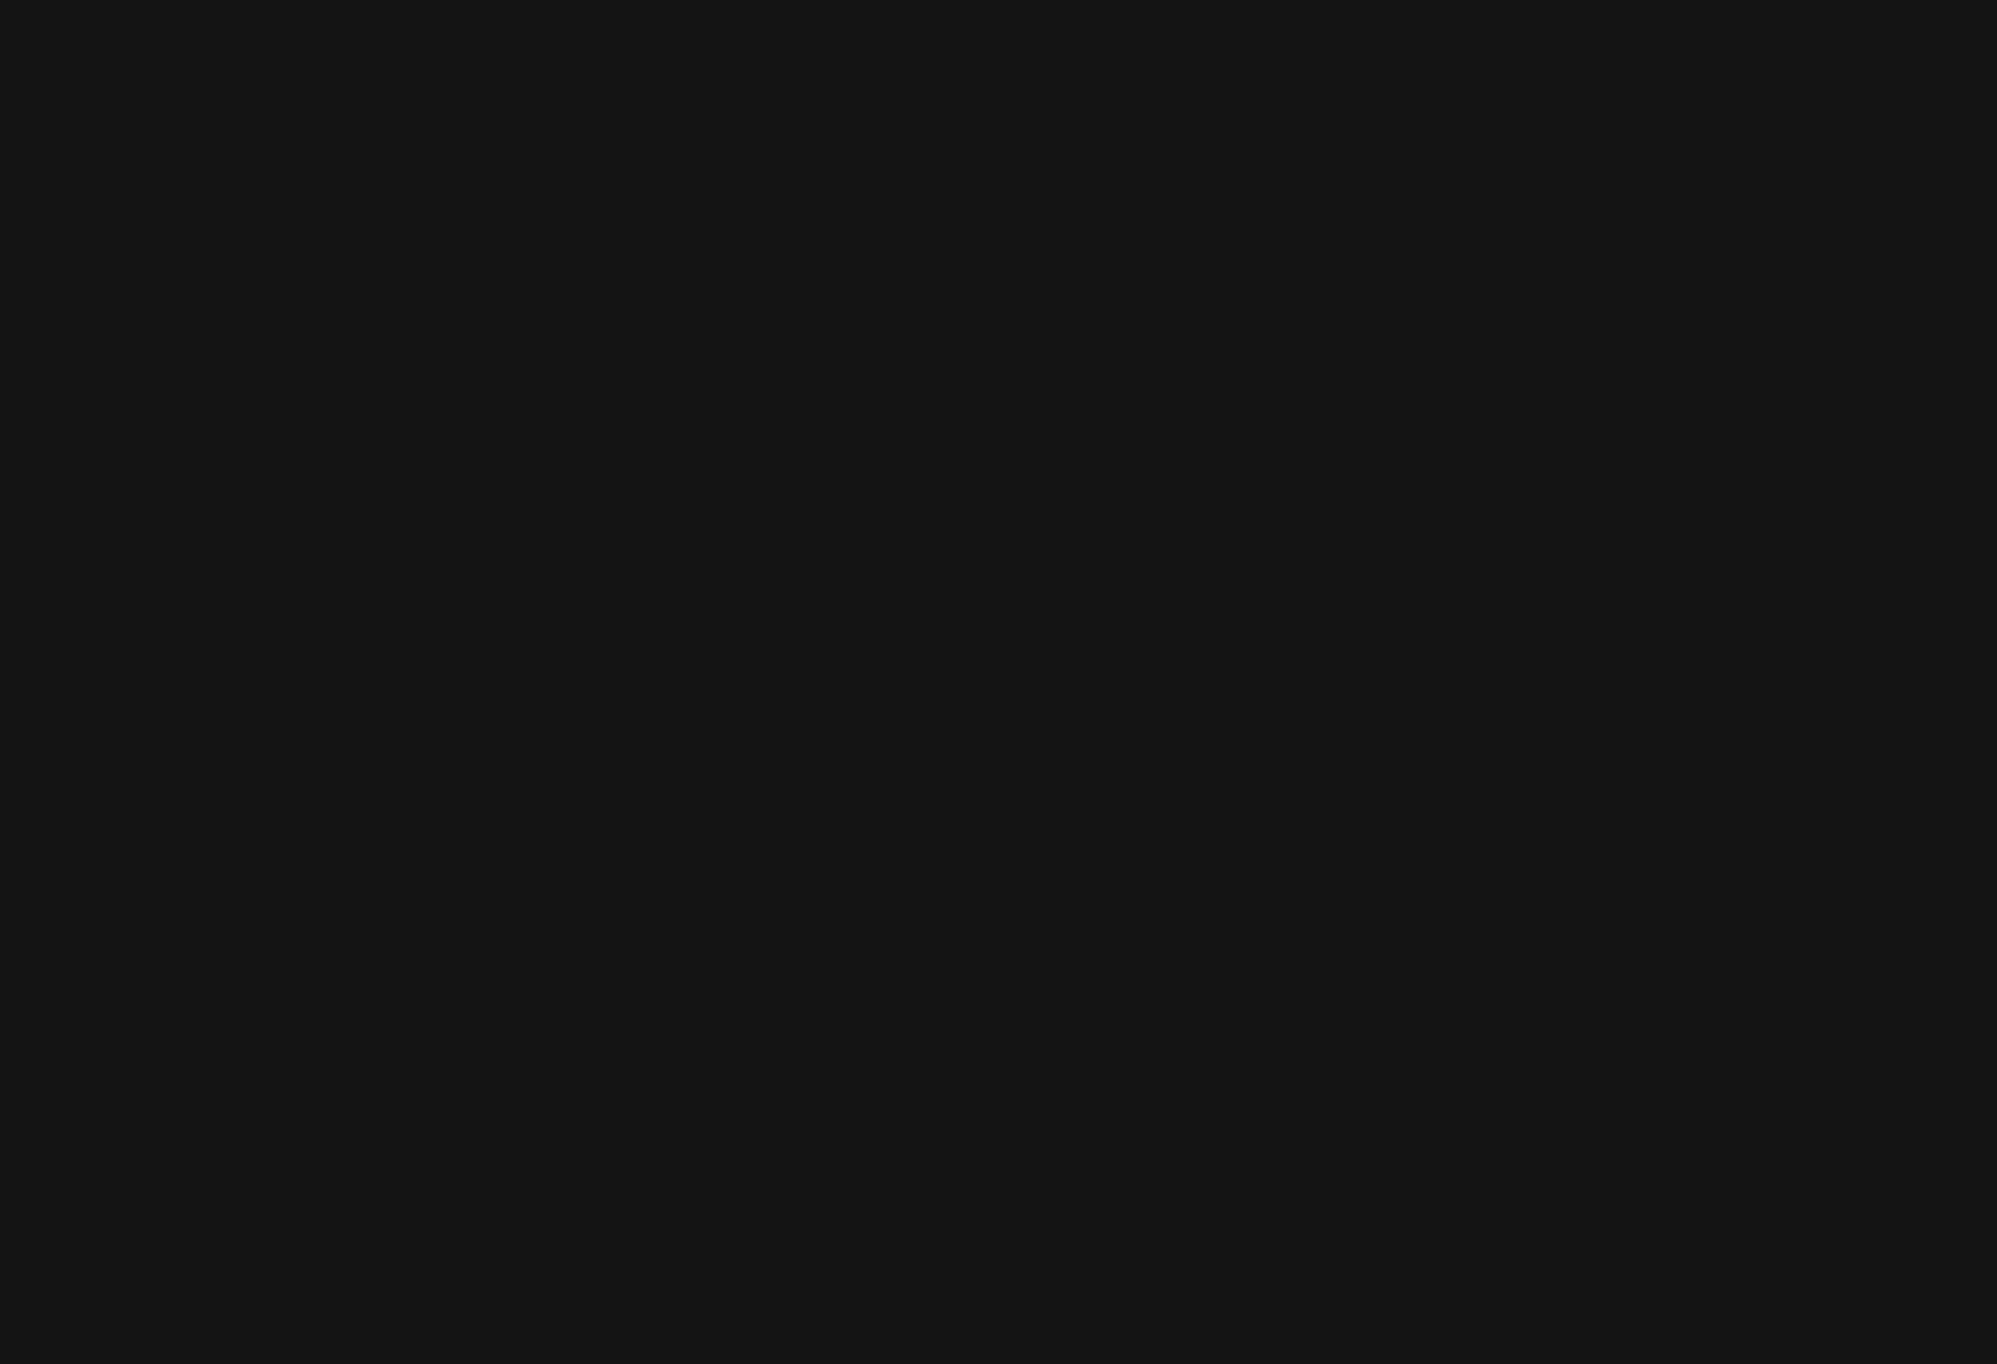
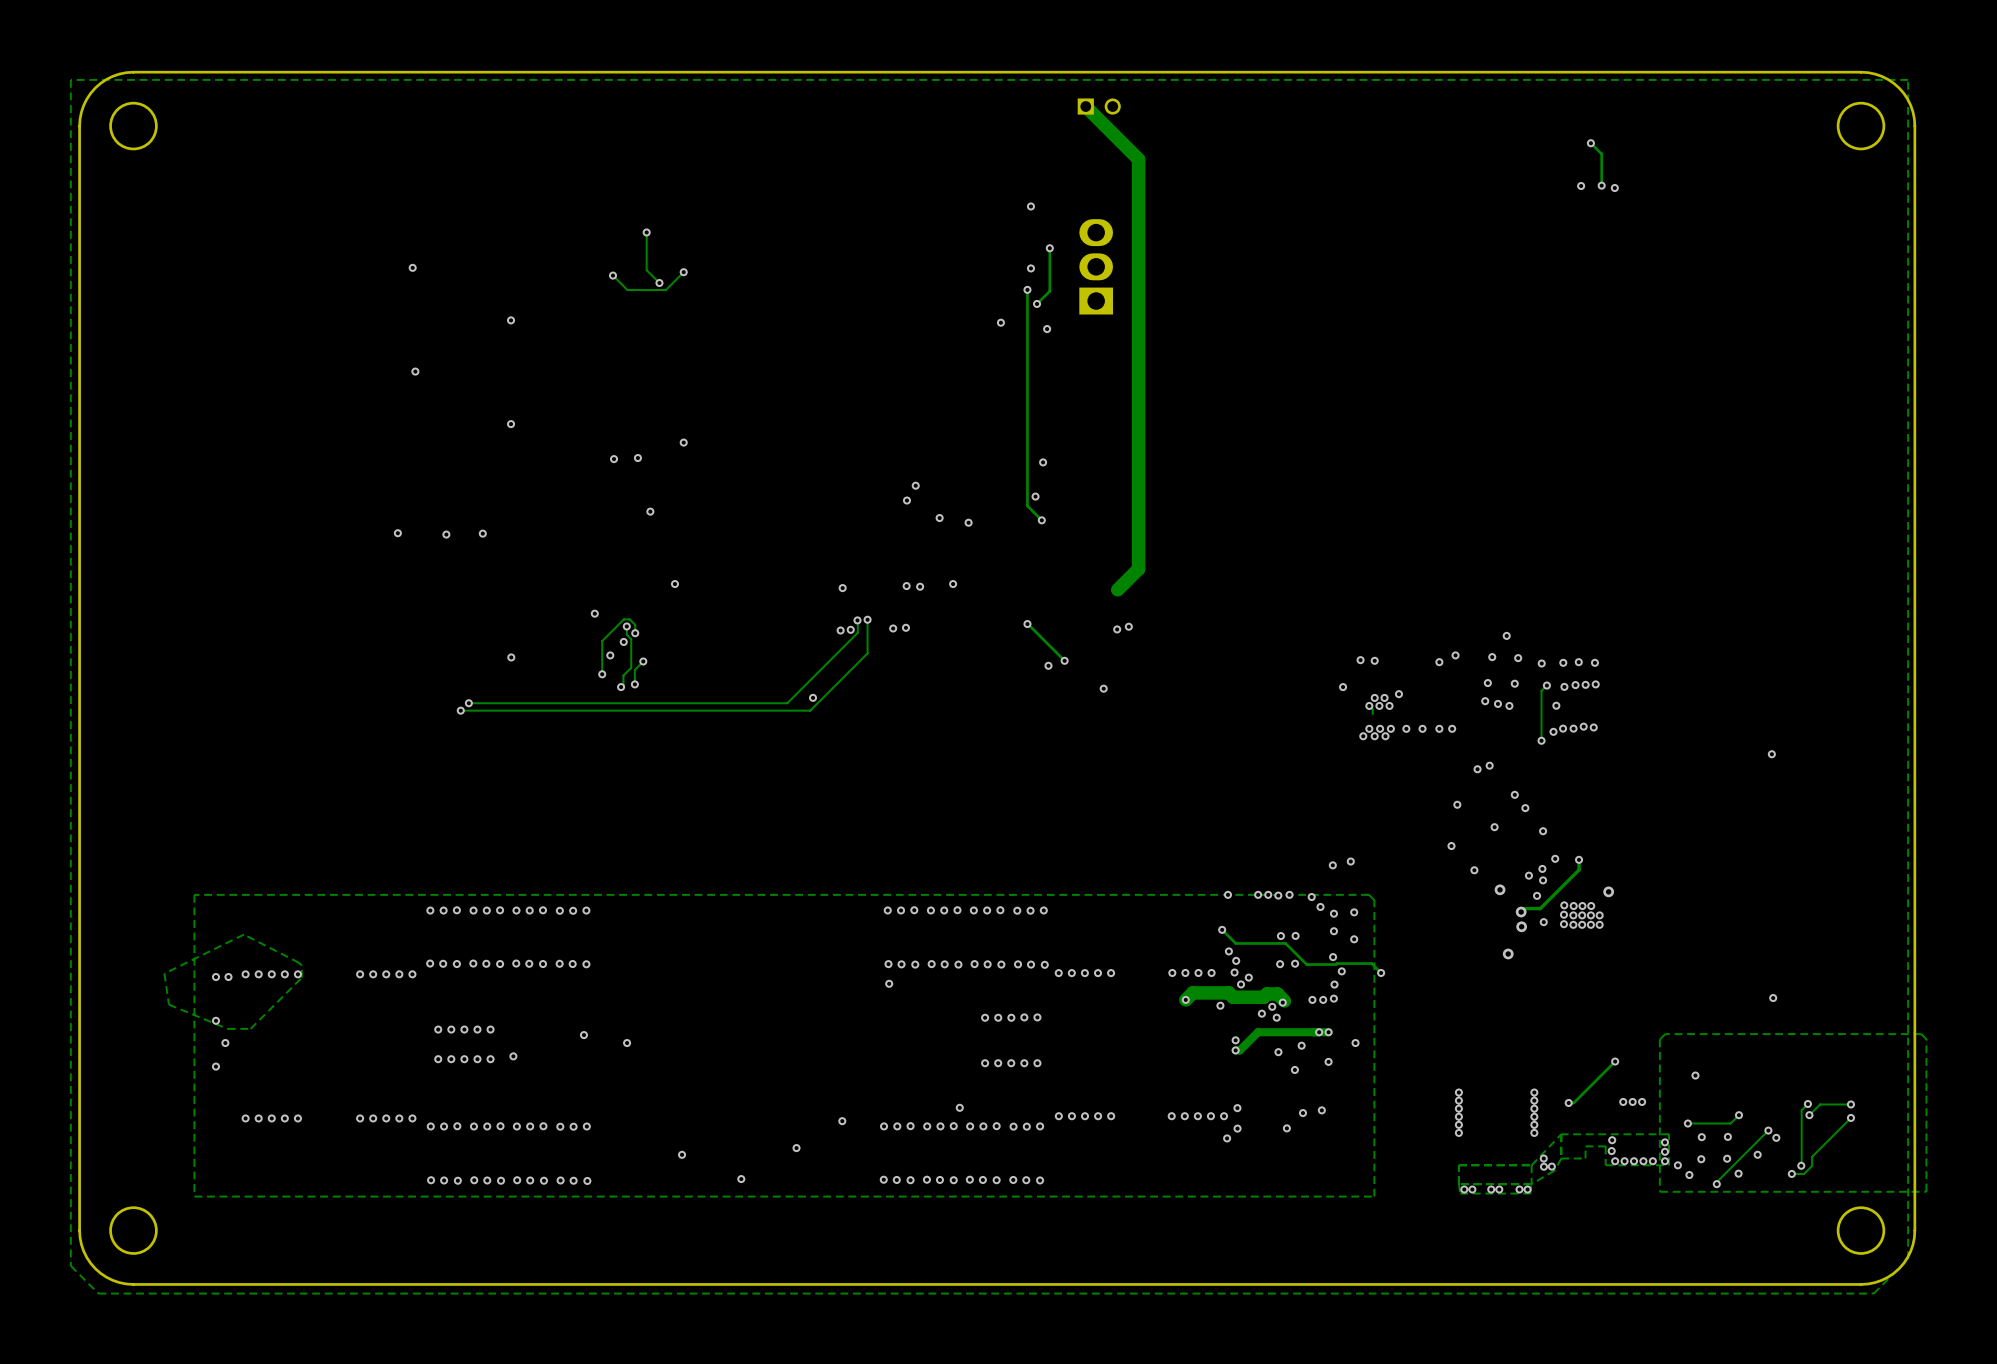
board edge: none -> (1860, 72) (133, 72) (112, 76) (100, 83) (86, 99) (81, 112) (79, 126) (79, 1230) (81, 1244) (90, 1263) (106, 1277) (119, 1282) (133, 1284) (1860, 1284) (1874, 1282) (1893, 1273) (1903, 1263) (1910, 1251) (1914, 1230) (1914, 126) (1910, 105) (1899, 87) (1881, 76) (1860, 72)
zone outline: none -> (1908, 79) (70, 79) (70, 1265) (98, 1293) (1873, 1293) (1908, 1259) (1908, 79)
round board edge: none -> [109, 101, 158, 151]
round board edge: none -> [1836, 101, 1886, 151]
track: none -> (1085, 106) (1138, 159) (1138, 568) (1117, 589)
part: none -> (1099, 106)
track: none -> (1590, 143) (1601, 154) (1601, 185)
via: none -> (1590, 143)
via: none -> (1601, 185)
via: none -> (1581, 186)
via: none -> (1614, 188)
via: none -> (1030, 206)
track: none -> (646, 232) (646, 270) (659, 282)
via: none -> (646, 232)
track: none -> (1049, 248) (1049, 291) (1037, 303)
via: none -> (1049, 248)
part: none -> (1096, 266)
via: none -> (412, 267)
via: none -> (1030, 268)
track: none -> (683, 272) (665, 290) (627, 290) (613, 275)
via: none -> (683, 272)
via: none -> (613, 275)
via: none -> (659, 282)
track: none -> (1027, 289) (1027, 505) (1041, 520)
via: none -> (1027, 289)
via: none -> (1037, 303)
via: none -> (511, 320)
via: none -> (1000, 322)
via: none -> (1047, 329)
via: none -> (415, 371)
via: none -> (511, 424)
via: none -> (683, 442)
via: none -> (637, 458)
via: none -> (614, 459)
via: none -> (1043, 462)
via: none -> (915, 485)
via: none -> (1035, 496)
via: none -> (906, 500)
via: none -> (650, 511)
via: none -> (939, 518)
via: none -> (1041, 520)
via: none -> (968, 522)
via: none -> (397, 533)
via: none -> (482, 533)
via: none -> (446, 534)
via: none -> (674, 584)
via: none -> (953, 584)
via: none -> (906, 586)
via: none -> (920, 586)
via: none -> (842, 588)
via: none -> (594, 613)
track: none -> (867, 619) (867, 653) (810, 710) (460, 710)
via: none -> (867, 619)
track: none -> (857, 620) (857, 632) (787, 703) (468, 703)
via: none -> (857, 620)
track: none -> (1027, 624) (1064, 660)
via: none -> (1027, 624)
track: none -> (626, 626) (626, 634) (631, 639) (631, 667) (623, 675) (623, 684) (621, 687)
via: none -> (626, 626)
via: none -> (1128, 626)
via: none -> (905, 627)
via: none -> (893, 628)
via: none -> (850, 629)
via: none -> (1117, 629)
via: none -> (840, 630)
track: none -> (635, 633) (635, 624) (629, 619) (623, 619) (602, 641) (602, 674)
via: none -> (635, 633)
via: none -> (1506, 635)
via: none -> (623, 641)
via: none -> (610, 655)
via: none -> (1455, 655)
via: none -> (511, 657)
via: none -> (1492, 657)
via: none -> (1518, 658)
via: none -> (1064, 660)
via: none -> (1360, 660)
via: none -> (1374, 660)
track: none -> (643, 661) (634, 669) (634, 684)
via: none -> (643, 661)
via: none -> (1439, 662)
via: none -> (1563, 662)
via: none -> (1578, 662)
via: none -> (1594, 662)
via: none -> (1541, 663)
via: none -> (1048, 665)
via: none -> (602, 674)
via: none -> (1487, 683)
via: none -> (1514, 683)
via: none -> (634, 684)
via: none -> (1585, 684)
via: none -> (1595, 684)
track: none -> (1546, 685) (1541, 690) (1541, 740)
via: none -> (1546, 685)
via: none -> (1575, 685)
via: none -> (1564, 686)
via: none -> (621, 687)
via: none -> (1343, 687)
via: none -> (1103, 688)
via: none -> (1398, 694)
via: none -> (813, 697)
via: none -> (1374, 697)
via: none -> (1384, 697)
via: none -> (1485, 701)
via: none -> (468, 703)
via: none -> (1497, 703)
track: none -> (1369, 705) (1372, 709) (1372, 714)
via: none -> (1369, 705)
via: none -> (1379, 705)
via: none -> (1389, 705)
via: none -> (1509, 705)
via: none -> (1556, 705)
via: none -> (460, 710)
via: none -> (1583, 726)
via: none -> (1593, 727)
via: none -> (1369, 728)
via: none -> (1380, 728)
via: none -> (1390, 728)
via: none -> (1406, 728)
via: none -> (1422, 728)
via: none -> (1439, 728)
via: none -> (1452, 728)
via: none -> (1563, 728)
via: none -> (1573, 728)
via: none -> (1553, 731)
via: none -> (1363, 736)
via: none -> (1374, 736)
via: none -> (1385, 736)
via: none -> (1541, 740)
via: none -> (1771, 754)
via: none -> (1489, 765)
via: none -> (1477, 769)
via: none -> (1514, 794)
via: none -> (1457, 804)
via: none -> (1525, 808)
via: none -> (1494, 827)
via: none -> (1543, 831)
via: none -> (1451, 846)
via: none -> (1555, 858)
track: none -> (1579, 859) (1579, 869) (1540, 908) (1524, 908) (1521, 912)
via: none -> (1579, 859)
via: none -> (1350, 861)
via: none -> (1332, 865)
via: none -> (1542, 868)
via: none -> (1474, 870)
via: none -> (1528, 875)
via: none -> (1543, 880)
via: none -> (1500, 889)
via: none -> (1608, 891)
via: none -> (1227, 894)
via: none -> (1258, 894)
via: none -> (1268, 894)
via: none -> (1289, 894)
zone outline: none -> (1368, 894) (194, 894) (194, 1196) (1374, 1196) (1374, 900) (1368, 894)
via: none -> (1278, 895)
via: none -> (1537, 895)
via: none -> (1311, 897)
via: none -> (1564, 905)
via: none -> (1320, 906)
via: none -> (1573, 906)
via: none -> (1582, 906)
via: none -> (1591, 906)
via: none -> (430, 910)
via: none -> (443, 910)
via: none -> (456, 910)
via: none -> (473, 910)
via: none -> (486, 910)
via: none -> (500, 910)
via: none -> (516, 910)
via: none -> (529, 910)
via: none -> (542, 910)
via: none -> (559, 910)
via: none -> (573, 910)
via: none -> (586, 910)
via: none -> (887, 910)
via: none -> (901, 910)
via: none -> (914, 910)
via: none -> (930, 910)
via: none -> (944, 910)
via: none -> (957, 910)
via: none -> (973, 910)
via: none -> (987, 910)
via: none -> (1000, 910)
via: none -> (1017, 910)
via: none -> (1030, 910)
via: none -> (1043, 910)
via: none -> (1354, 912)
via: none -> (1521, 912)
via: none -> (1333, 913)
via: none -> (1563, 914)
via: none -> (1573, 915)
via: none -> (1582, 915)
via: none -> (1590, 915)
via: none -> (1599, 915)
via: none -> (1543, 922)
via: none -> (1563, 924)
via: none -> (1573, 924)
via: none -> (1582, 924)
via: none -> (1590, 924)
via: none -> (1599, 924)
via: none -> (1521, 926)
track: none -> (1222, 929) (1235, 943) (1285, 943) (1306, 964) (1371, 963) (1381, 972)
via: none -> (1222, 929)
via: none -> (1333, 931)
zone outline: none -> (243, 934) (301, 965) (301, 977) (250, 1028) (227, 1028) (168, 1004) (164, 973) (243, 934)
via: none -> (1295, 935)
via: none -> (1280, 936)
via: none -> (1354, 939)
via: none -> (1228, 951)
via: none -> (1508, 953)
via: none -> (1333, 957)
via: none -> (1236, 960)
via: none -> (430, 963)
via: none -> (443, 963)
via: none -> (473, 963)
via: none -> (486, 963)
via: none -> (516, 963)
via: none -> (529, 963)
via: none -> (559, 963)
via: none -> (1295, 963)
via: none -> (456, 964)
via: none -> (500, 964)
via: none -> (543, 964)
via: none -> (572, 964)
via: none -> (586, 964)
via: none -> (888, 964)
via: none -> (901, 964)
via: none -> (915, 964)
via: none -> (931, 964)
via: none -> (944, 964)
via: none -> (958, 964)
via: none -> (974, 964)
via: none -> (987, 964)
via: none -> (1001, 964)
via: none -> (1018, 964)
via: none -> (1031, 964)
via: none -> (1044, 964)
via: none -> (1280, 964)
via: none -> (1341, 971)
via: none -> (1172, 972)
via: none -> (1185, 972)
via: none -> (1198, 972)
via: none -> (1211, 972)
via: none -> (1234, 972)
via: none -> (1381, 972)
via: none -> (1058, 973)
via: none -> (1071, 973)
via: none -> (1084, 973)
via: none -> (1097, 973)
via: none -> (1111, 973)
via: none -> (245, 974)
via: none -> (258, 974)
via: none -> (271, 974)
via: none -> (284, 974)
via: none -> (297, 974)
via: none -> (360, 974)
via: none -> (373, 974)
via: none -> (386, 974)
via: none -> (399, 974)
via: none -> (412, 974)
via: none -> (215, 977)
via: none -> (228, 977)
via: none -> (1248, 977)
via: none -> (889, 983)
via: none -> (1241, 984)
via: none -> (1334, 984)
via: none -> (1333, 998)
via: none -> (1773, 998)
track: none -> (1185, 999) (1192, 992) (1228, 992) (1233, 997) (1263, 997) (1266, 994) (1277, 994) (1284, 1000)
via: none -> (1185, 999)
via: none -> (1312, 999)
via: none -> (1323, 999)
via: none -> (1282, 1002)
via: none -> (1220, 1005)
via: none -> (1272, 1006)
via: none -> (1261, 1013)
via: none -> (985, 1017)
via: none -> (998, 1017)
via: none -> (1011, 1017)
via: none -> (1024, 1017)
via: none -> (1037, 1017)
via: none -> (1276, 1017)
via: none -> (215, 1020)
via: none -> (438, 1029)
via: none -> (451, 1029)
via: none -> (464, 1029)
via: none -> (477, 1029)
via: none -> (490, 1029)
via: none -> (1319, 1032)
track: none -> (1328, 1032) (1258, 1032) (1239, 1050) (1235, 1050)
via: none -> (1328, 1032)
zone outline: none -> (1921, 1034) (1665, 1034) (1659, 1039) (1659, 1191) (1926, 1191) (1926, 1039) (1921, 1034)
via: none -> (583, 1035)
via: none -> (1235, 1040)
via: none -> (225, 1043)
via: none -> (627, 1043)
via: none -> (1355, 1043)
via: none -> (1301, 1045)
via: none -> (1235, 1050)
via: none -> (1278, 1052)
via: none -> (513, 1056)
via: none -> (438, 1059)
via: none -> (451, 1059)
via: none -> (464, 1059)
via: none -> (477, 1059)
via: none -> (490, 1059)
via: none -> (1328, 1061)
track: none -> (1615, 1061) (1573, 1102) (1568, 1102)
via: none -> (1615, 1061)
via: none -> (985, 1063)
via: none -> (998, 1063)
via: none -> (1011, 1063)
via: none -> (1024, 1063)
via: none -> (1037, 1063)
via: none -> (215, 1066)
via: none -> (1294, 1069)
via: none -> (1695, 1075)
via: none -> (1458, 1092)
via: none -> (1534, 1092)
via: none -> (1458, 1100)
via: none -> (1534, 1100)
via: none -> (1623, 1101)
via: none -> (1632, 1101)
via: none -> (1642, 1101)
via: none -> (1568, 1102)
track: none -> (1807, 1104) (1801, 1110) (1801, 1165)
via: none -> (1807, 1104)
track: none -> (1850, 1104) (1820, 1104) (1809, 1115)
via: none -> (1850, 1104)
via: none -> (959, 1107)
via: none -> (1237, 1108)
via: none -> (1458, 1108)
via: none -> (1534, 1108)
via: none -> (1321, 1110)
via: none -> (1302, 1113)
track: none -> (1738, 1115) (1730, 1123) (1687, 1123)
via: none -> (1738, 1115)
via: none -> (1809, 1115)
via: none -> (1058, 1116)
via: none -> (1071, 1116)
via: none -> (1085, 1116)
via: none -> (1098, 1116)
via: none -> (1111, 1116)
via: none -> (1171, 1116)
via: none -> (1184, 1116)
via: none -> (1197, 1116)
via: none -> (1210, 1116)
via: none -> (1224, 1116)
via: none -> (1458, 1116)
via: none -> (1534, 1116)
track: none -> (1850, 1117) (1812, 1156) (1812, 1165) (1804, 1173) (1791, 1173)
via: none -> (1850, 1117)
via: none -> (245, 1118)
via: none -> (258, 1118)
via: none -> (271, 1118)
via: none -> (284, 1118)
via: none -> (297, 1118)
via: none -> (360, 1118)
via: none -> (373, 1118)
via: none -> (386, 1118)
via: none -> (399, 1118)
via: none -> (412, 1118)
via: none -> (842, 1121)
via: none -> (1687, 1123)
via: none -> (1458, 1124)
via: none -> (1534, 1124)
via: none -> (430, 1126)
via: none -> (444, 1126)
via: none -> (457, 1126)
via: none -> (473, 1126)
via: none -> (487, 1126)
via: none -> (500, 1126)
via: none -> (516, 1126)
via: none -> (530, 1126)
via: none -> (543, 1126)
via: none -> (560, 1126)
via: none -> (573, 1126)
via: none -> (586, 1126)
via: none -> (884, 1126)
via: none -> (897, 1126)
via: none -> (910, 1126)
via: none -> (927, 1126)
via: none -> (940, 1126)
via: none -> (953, 1126)
via: none -> (970, 1126)
via: none -> (983, 1126)
via: none -> (996, 1126)
via: none -> (1013, 1126)
via: none -> (1026, 1126)
via: none -> (1040, 1126)
via: none -> (1237, 1128)
via: none -> (1286, 1128)
track: none -> (1768, 1130) (1716, 1184)
via: none -> (1768, 1130)
via: none -> (1458, 1132)
via: none -> (1534, 1132)
zone outline: none -> (1561, 1134) (1561, 1158)
zone outline: none -> (1561, 1134) (1669, 1134) (1669, 1165) (1605, 1165) (1605, 1146) (1585, 1146) (1585, 1158) (1561, 1158)
zone outline: none -> (1561, 1134) (1531, 1165)
via: none -> (1727, 1136)
via: none -> (1701, 1137)
via: none -> (1776, 1137)
via: none -> (1227, 1138)
via: none -> (1612, 1140)
via: none -> (1664, 1142)
via: none -> (796, 1148)
via: none -> (1611, 1151)
via: none -> (1664, 1151)
via: none -> (682, 1154)
via: none -> (1757, 1154)
via: none -> (1543, 1158)
zone outline: none -> (1561, 1158) (1554, 1170) (1531, 1184)
via: none -> (1727, 1158)
via: none -> (1701, 1159)
via: none -> (1615, 1161)
via: none -> (1624, 1161)
via: none -> (1634, 1161)
via: none -> (1643, 1161)
via: none -> (1652, 1161)
via: none -> (1664, 1161)
zone outline: none -> (1531, 1165) (1458, 1165) (1458, 1184)
zone outline: none -> (1531, 1165) (1531, 1184)
via: none -> (1677, 1165)
via: none -> (1801, 1165)
via: none -> (1543, 1166)
via: none -> (1551, 1166)
via: none -> (1738, 1173)
via: none -> (1791, 1173)
via: none -> (1689, 1175)
via: none -> (741, 1179)
via: none -> (883, 1179)
via: none -> (896, 1179)
via: none -> (926, 1179)
via: none -> (939, 1179)
via: none -> (969, 1179)
via: none -> (982, 1179)
via: none -> (1013, 1179)
via: none -> (431, 1180)
via: none -> (444, 1180)
via: none -> (457, 1180)
via: none -> (474, 1180)
via: none -> (487, 1180)
via: none -> (501, 1180)
via: none -> (517, 1180)
via: none -> (530, 1180)
via: none -> (543, 1180)
via: none -> (560, 1180)
via: none -> (573, 1180)
via: none -> (587, 1180)
via: none -> (910, 1180)
via: none -> (953, 1180)
via: none -> (996, 1180)
via: none -> (1026, 1180)
via: none -> (1040, 1180)
zone outline: none -> (1531, 1184) (1530, 1193) (1460, 1193) (1458, 1184)
zone outline: none -> (1531, 1184) (1458, 1184)
via: none -> (1716, 1184)
via: none -> (1464, 1189)
via: none -> (1472, 1189)
via: none -> (1491, 1189)
via: none -> (1499, 1189)
via: none -> (1519, 1189)
via: none -> (1527, 1189)
round board edge: none -> [109, 1206, 158, 1255]
round board edge: none -> [1836, 1206, 1886, 1255]

